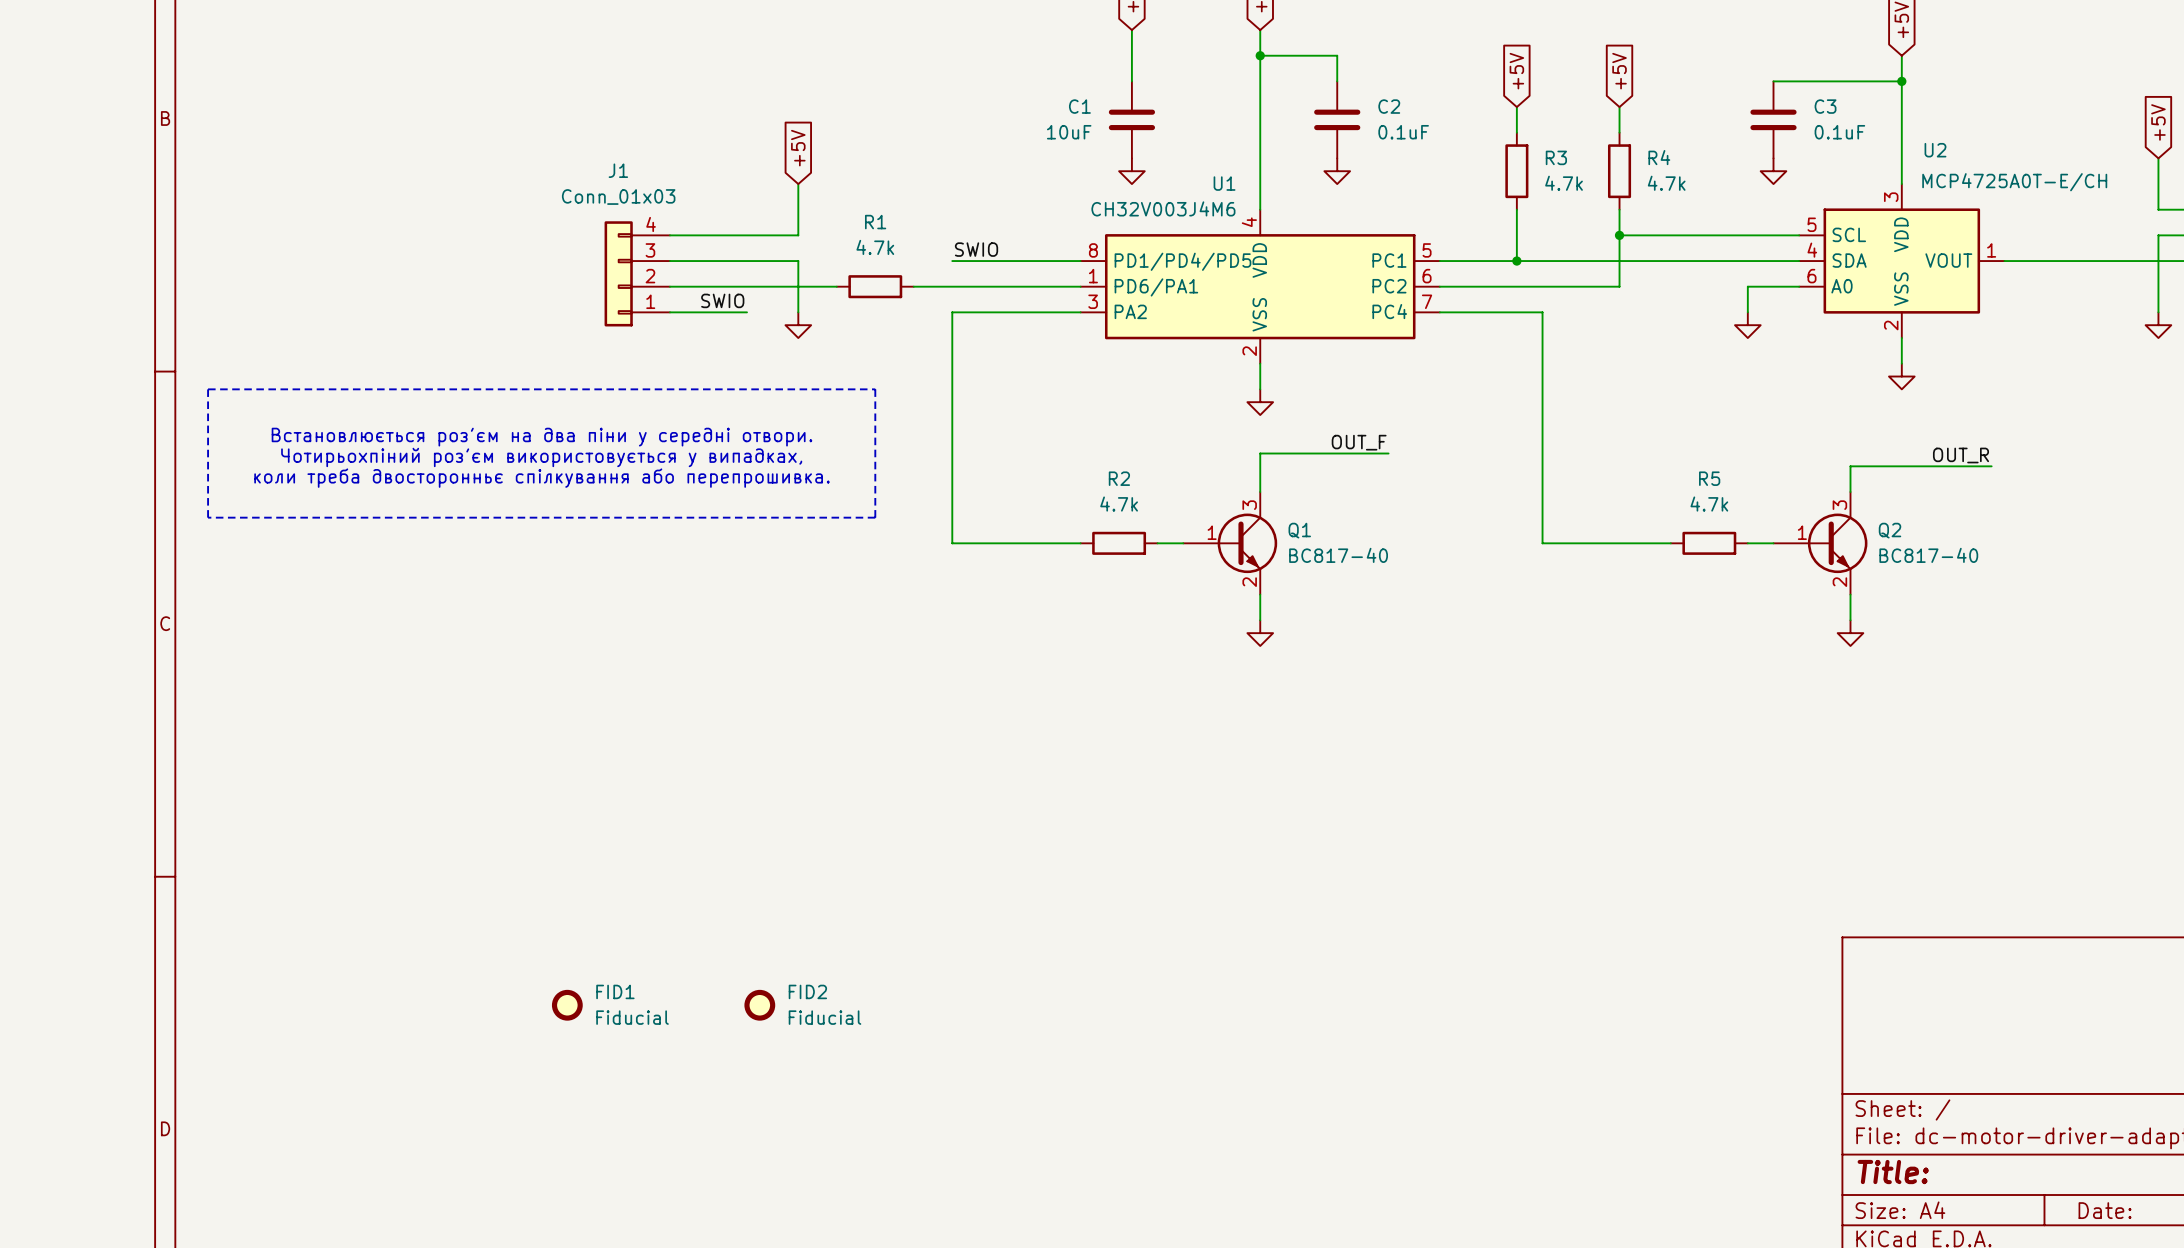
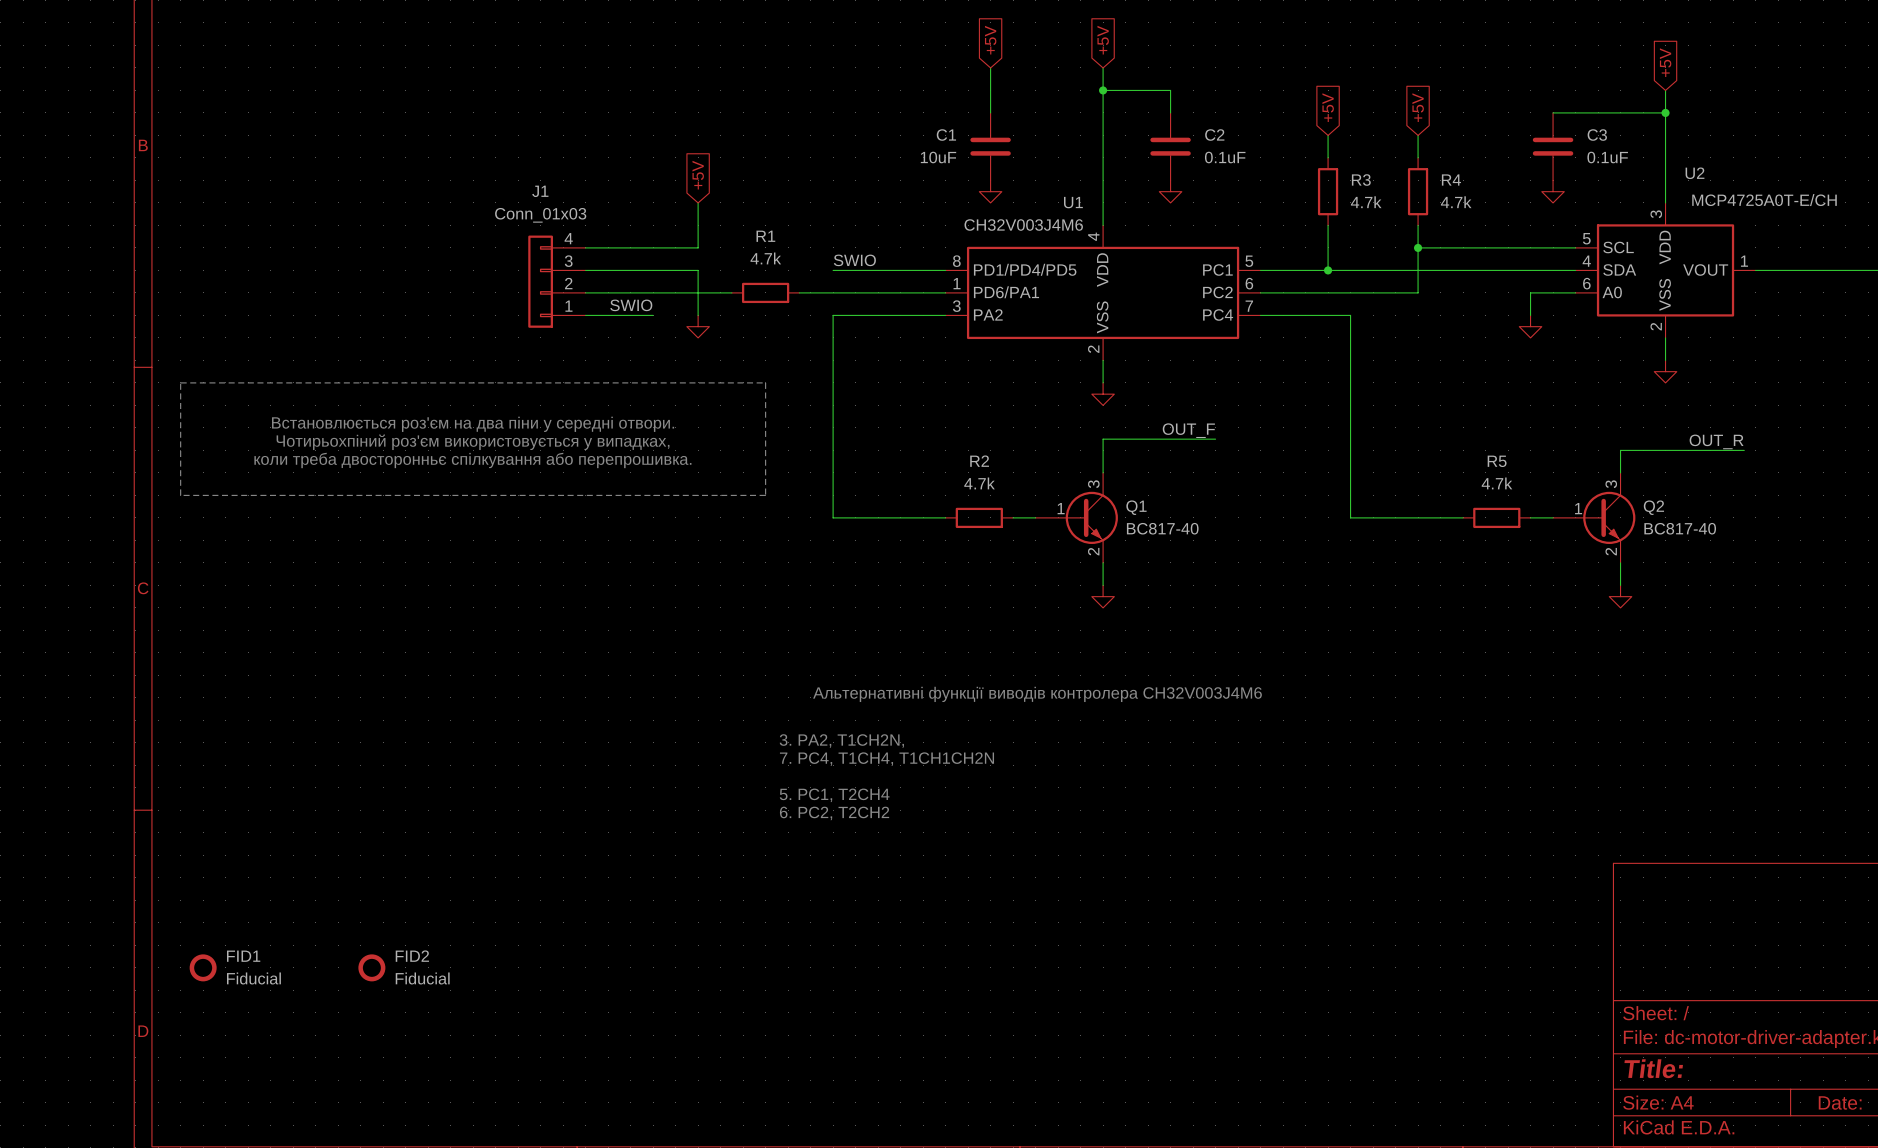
text: none -> Альтернативні функції виводів контролера CH32V003J4M6 (1037, 694)
text: none -> 3. PA2, T1CH2N, (841, 740)
text: none -> 7. PC4, T1CH4, T1CH1CH2N (886, 759)
text: none -> 5. PC1, T2CH4 (834, 795)
text: none -> 6. PC2, T2CH2 (834, 813)
FID1 position: (567, 1005) -> (203, 967)
FID2 position: (759, 1005) -> (371, 967)

